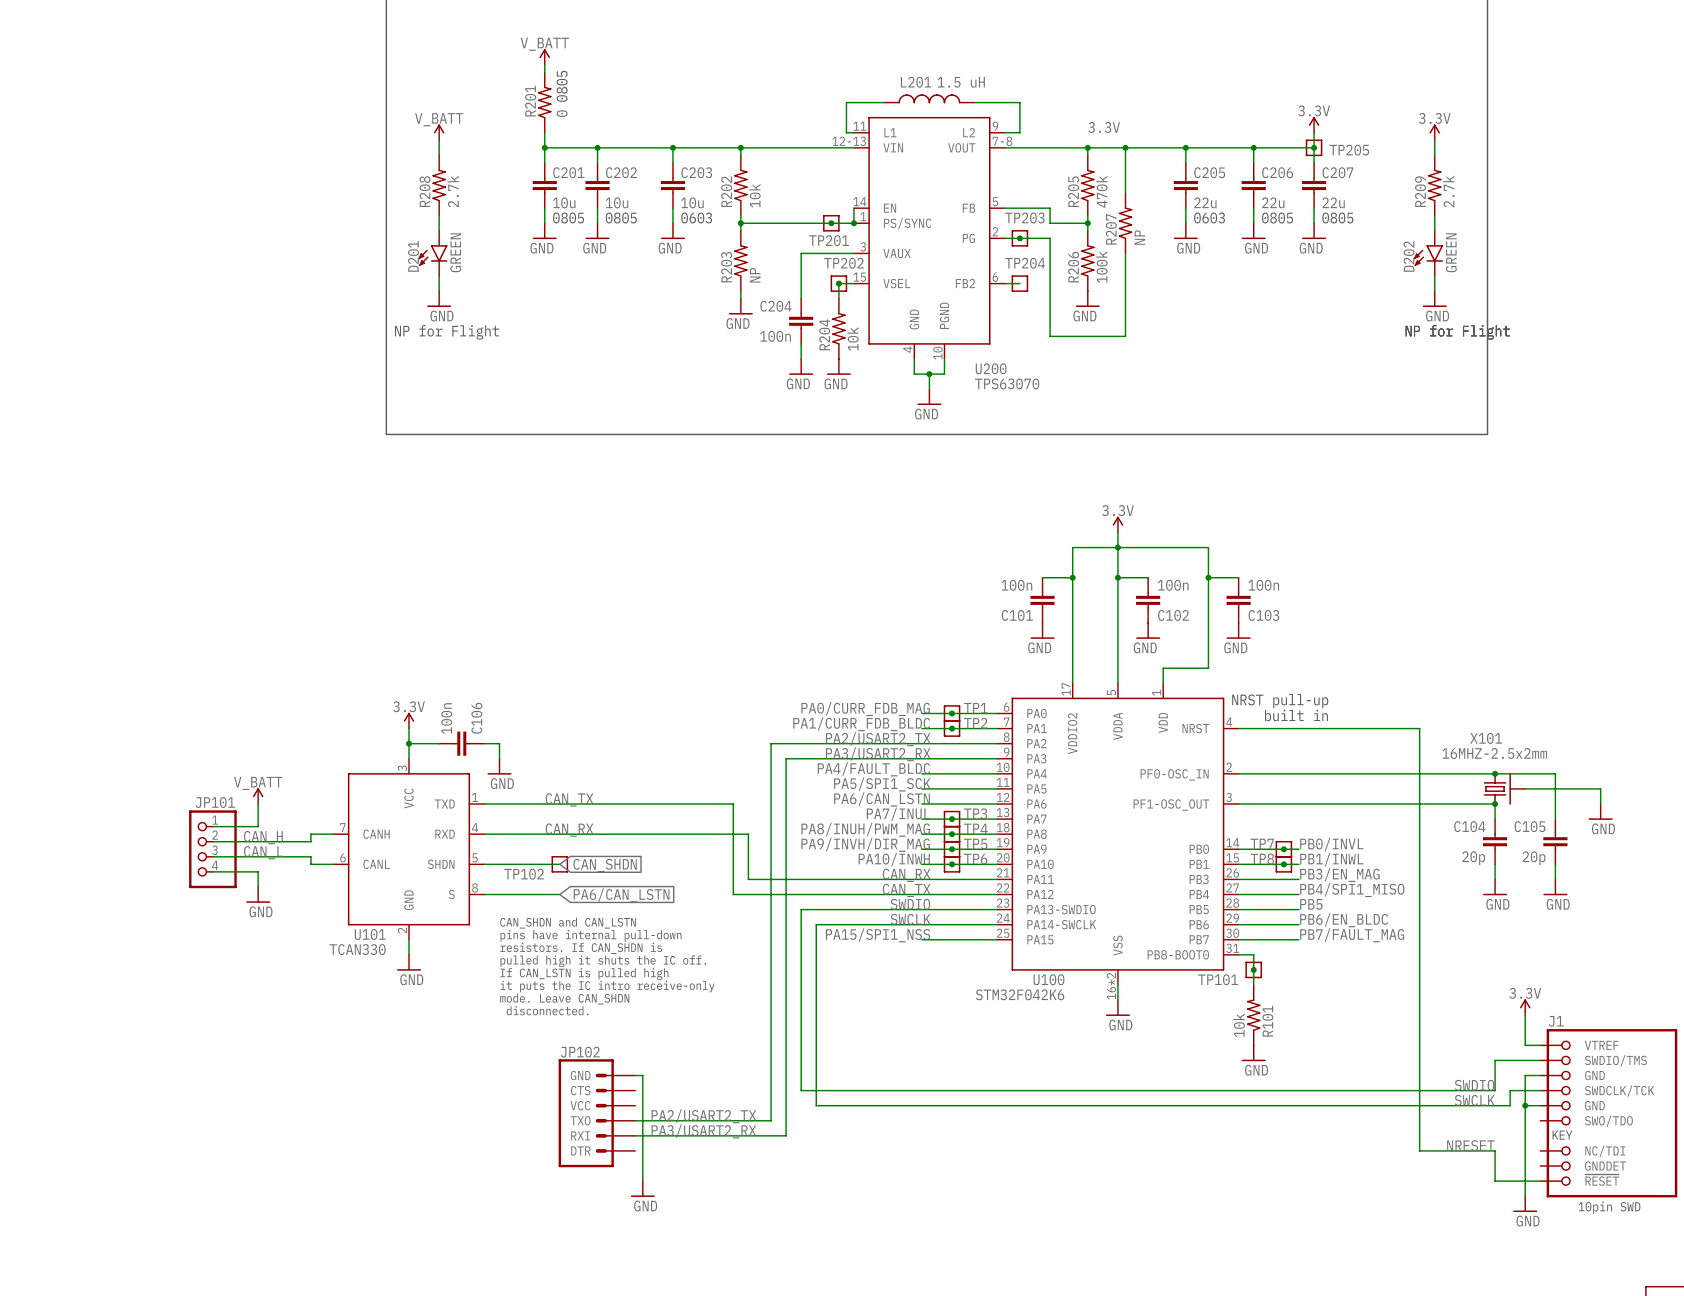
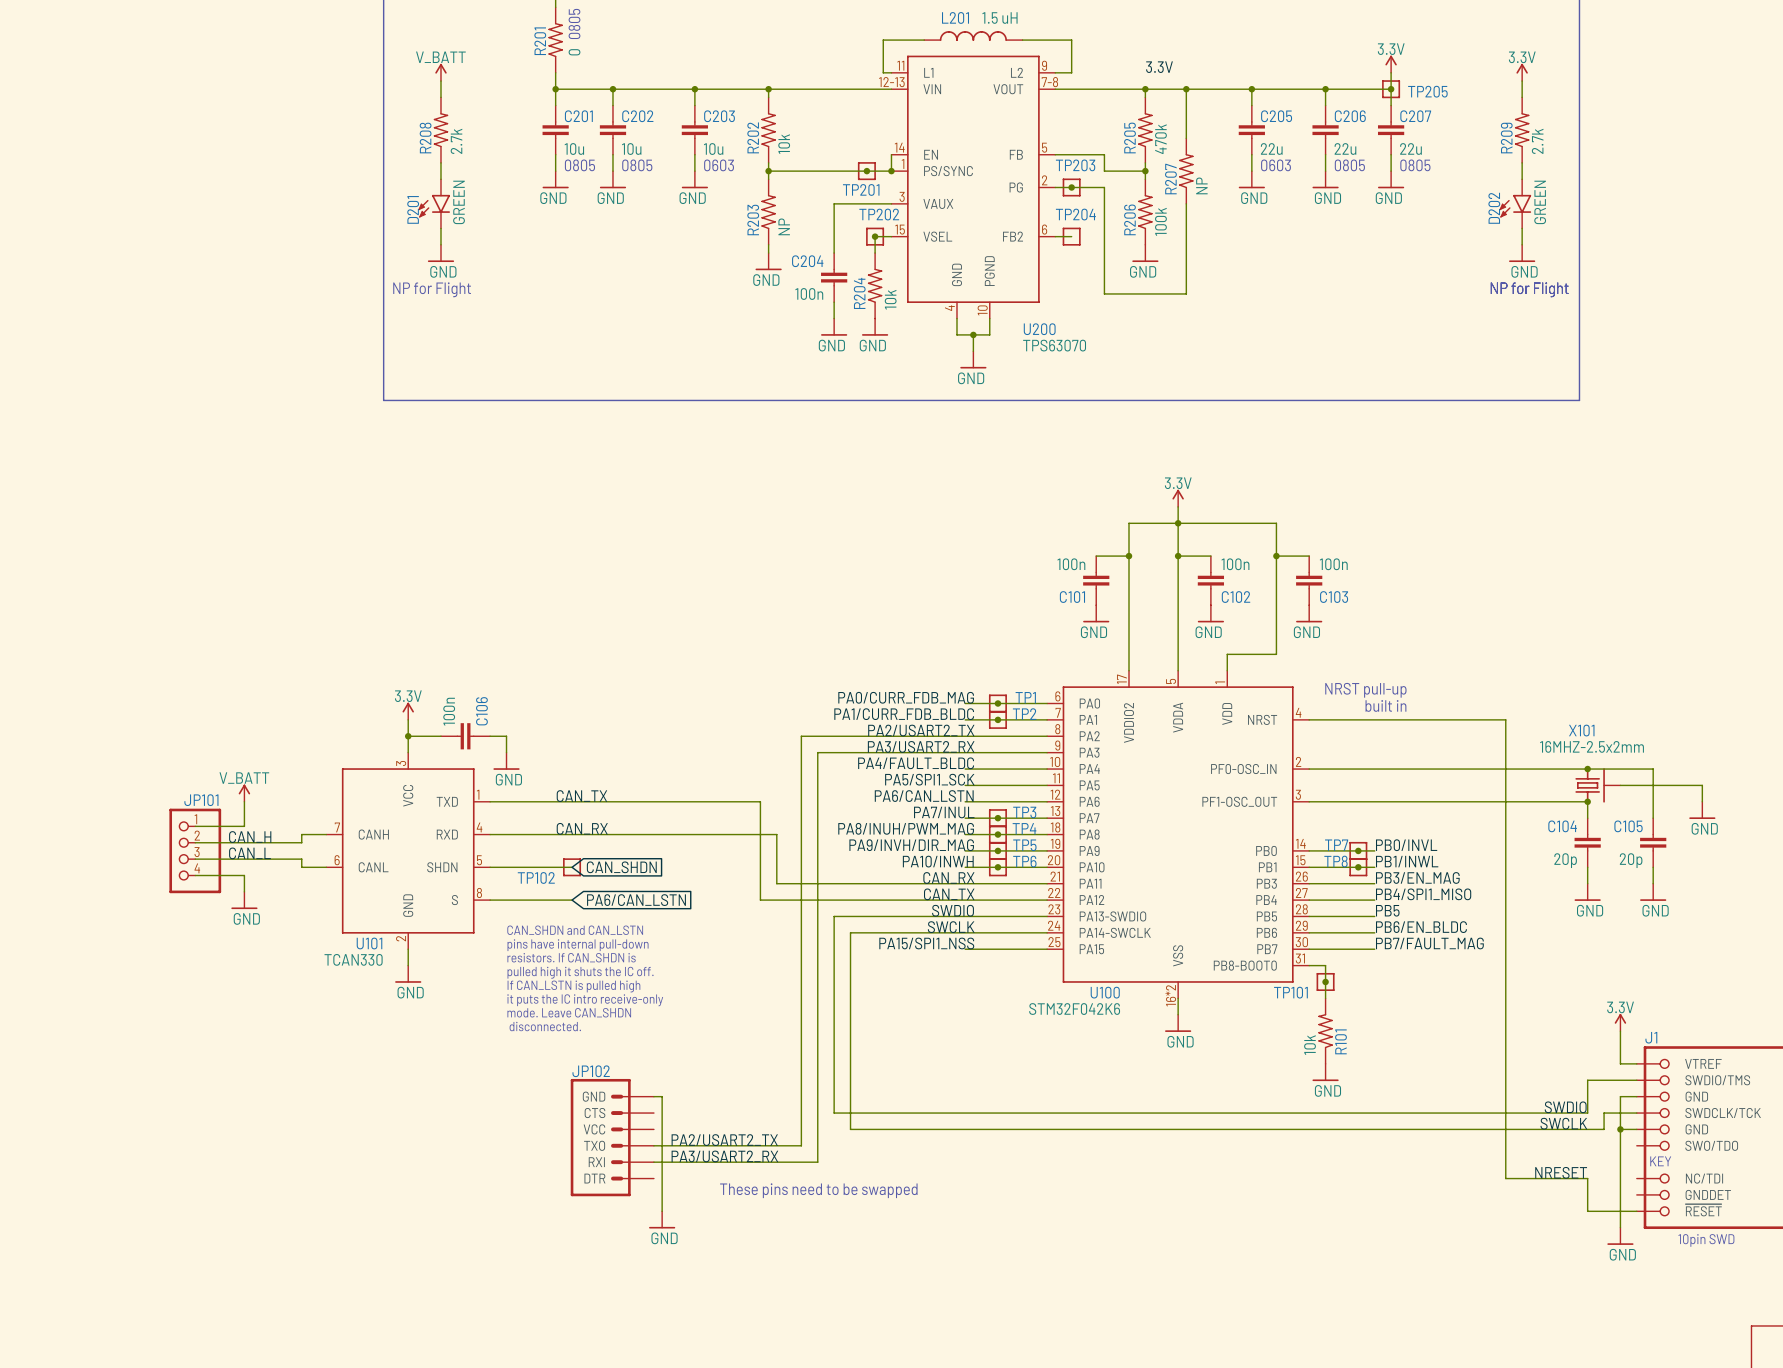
text: none -> These pins need to be swapped (818, 1190)

